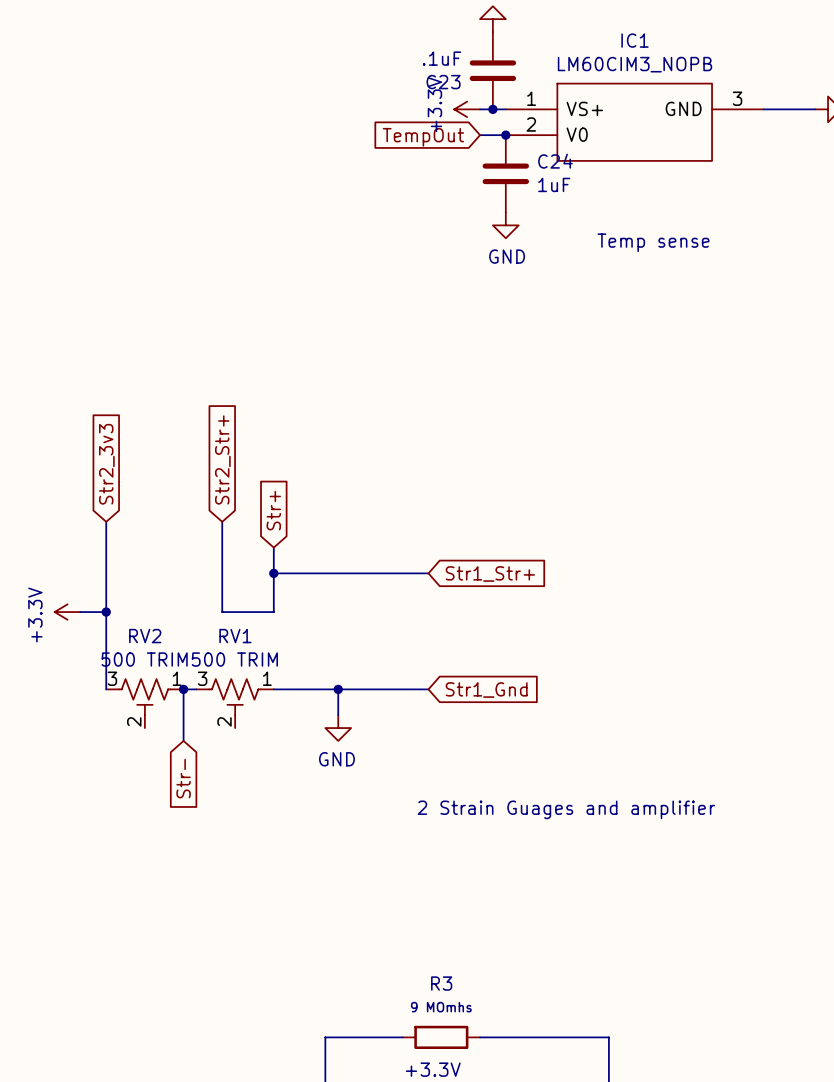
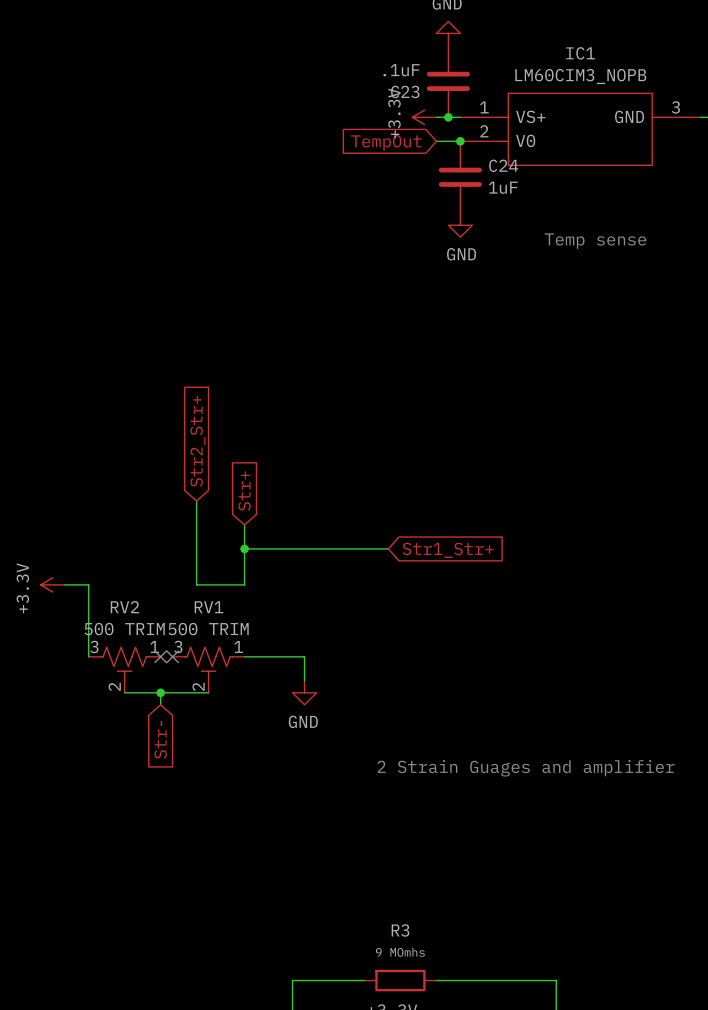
global label: Str2_3v3 (106, 464) -> none
wire: (106, 521) (106, 612) -> none
junction: (106, 612) -> none
junction position: (183, 689) -> (160, 692)
no-connect mark: none -> (160, 656)
wire: (196, 689) (183, 689) (183, 728) -> none
no-connect mark: none -> (172, 656)
wire: (338, 689) (428, 689) -> (124, 692) (208, 692)
junction: (338, 689) -> none
global label: Str1_Gnd (486, 690) -> none

